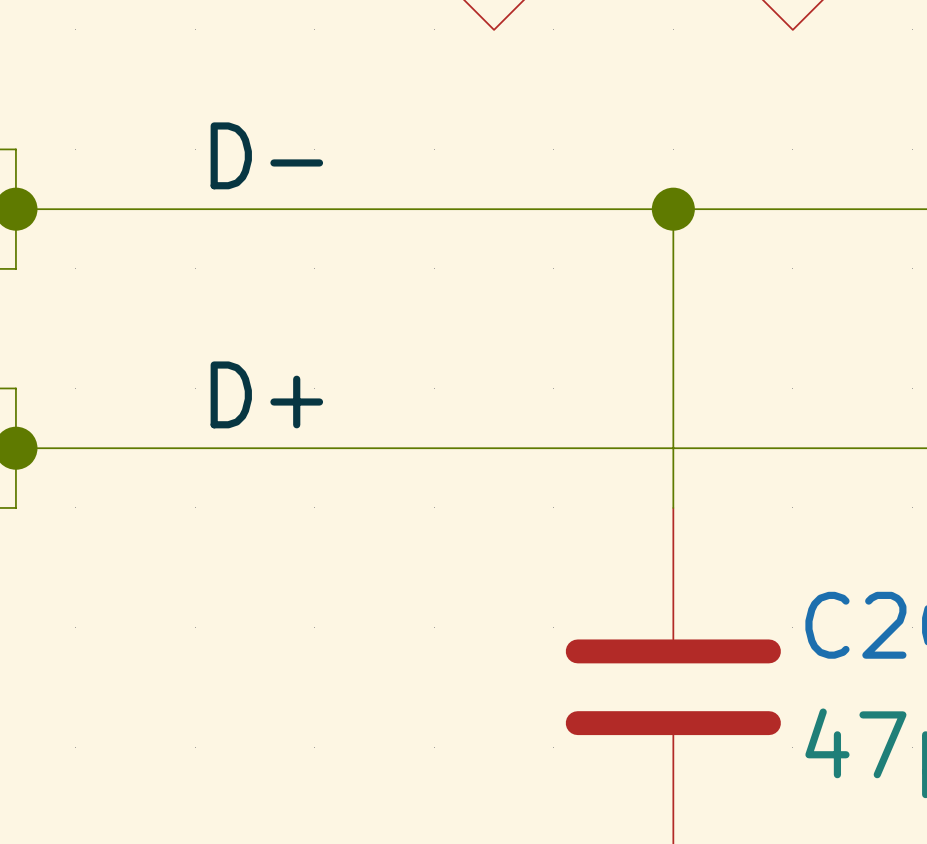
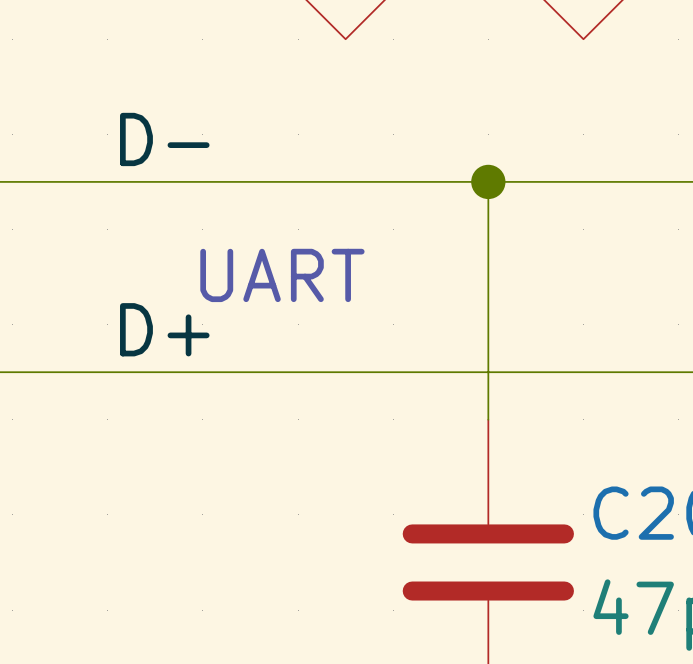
text: none -> UART (282, 275)

